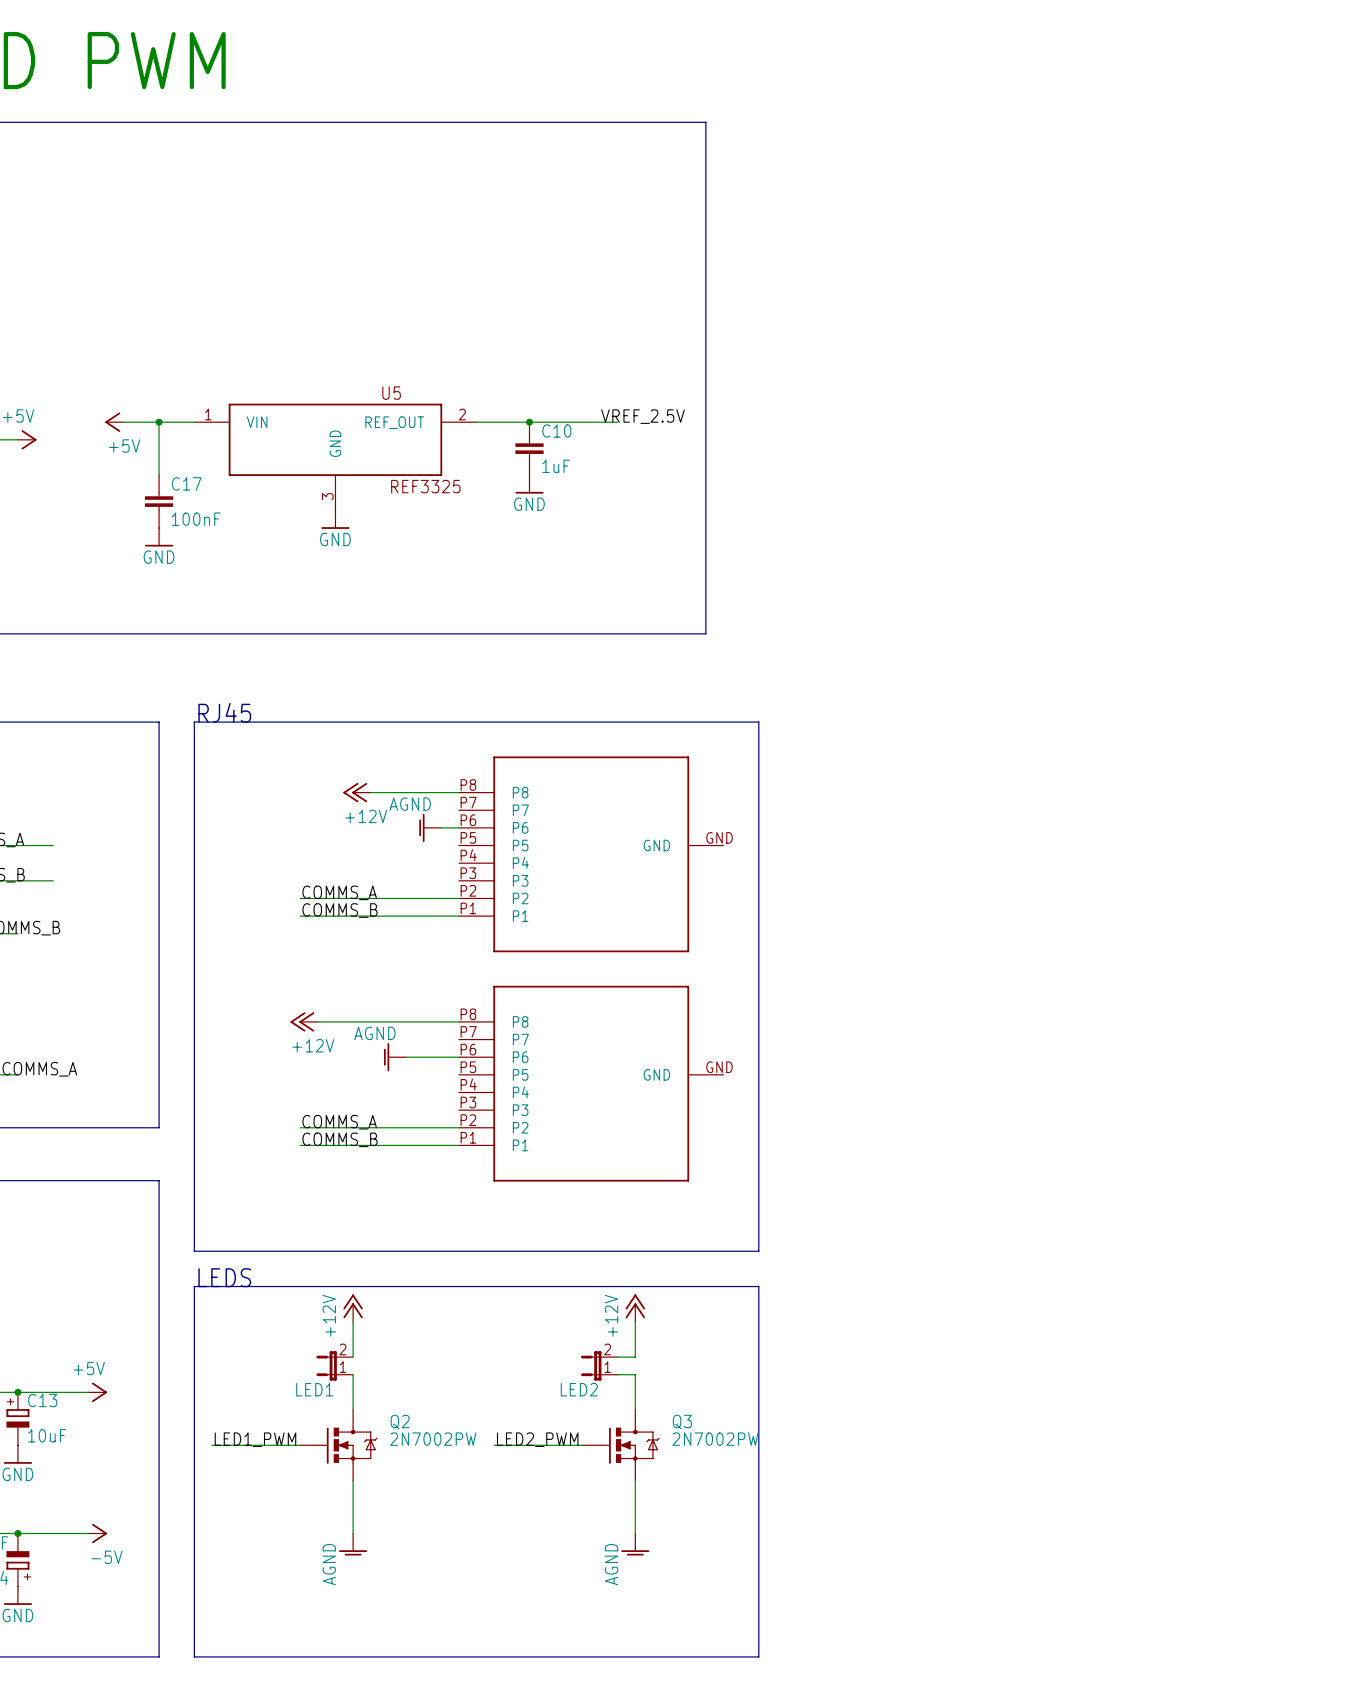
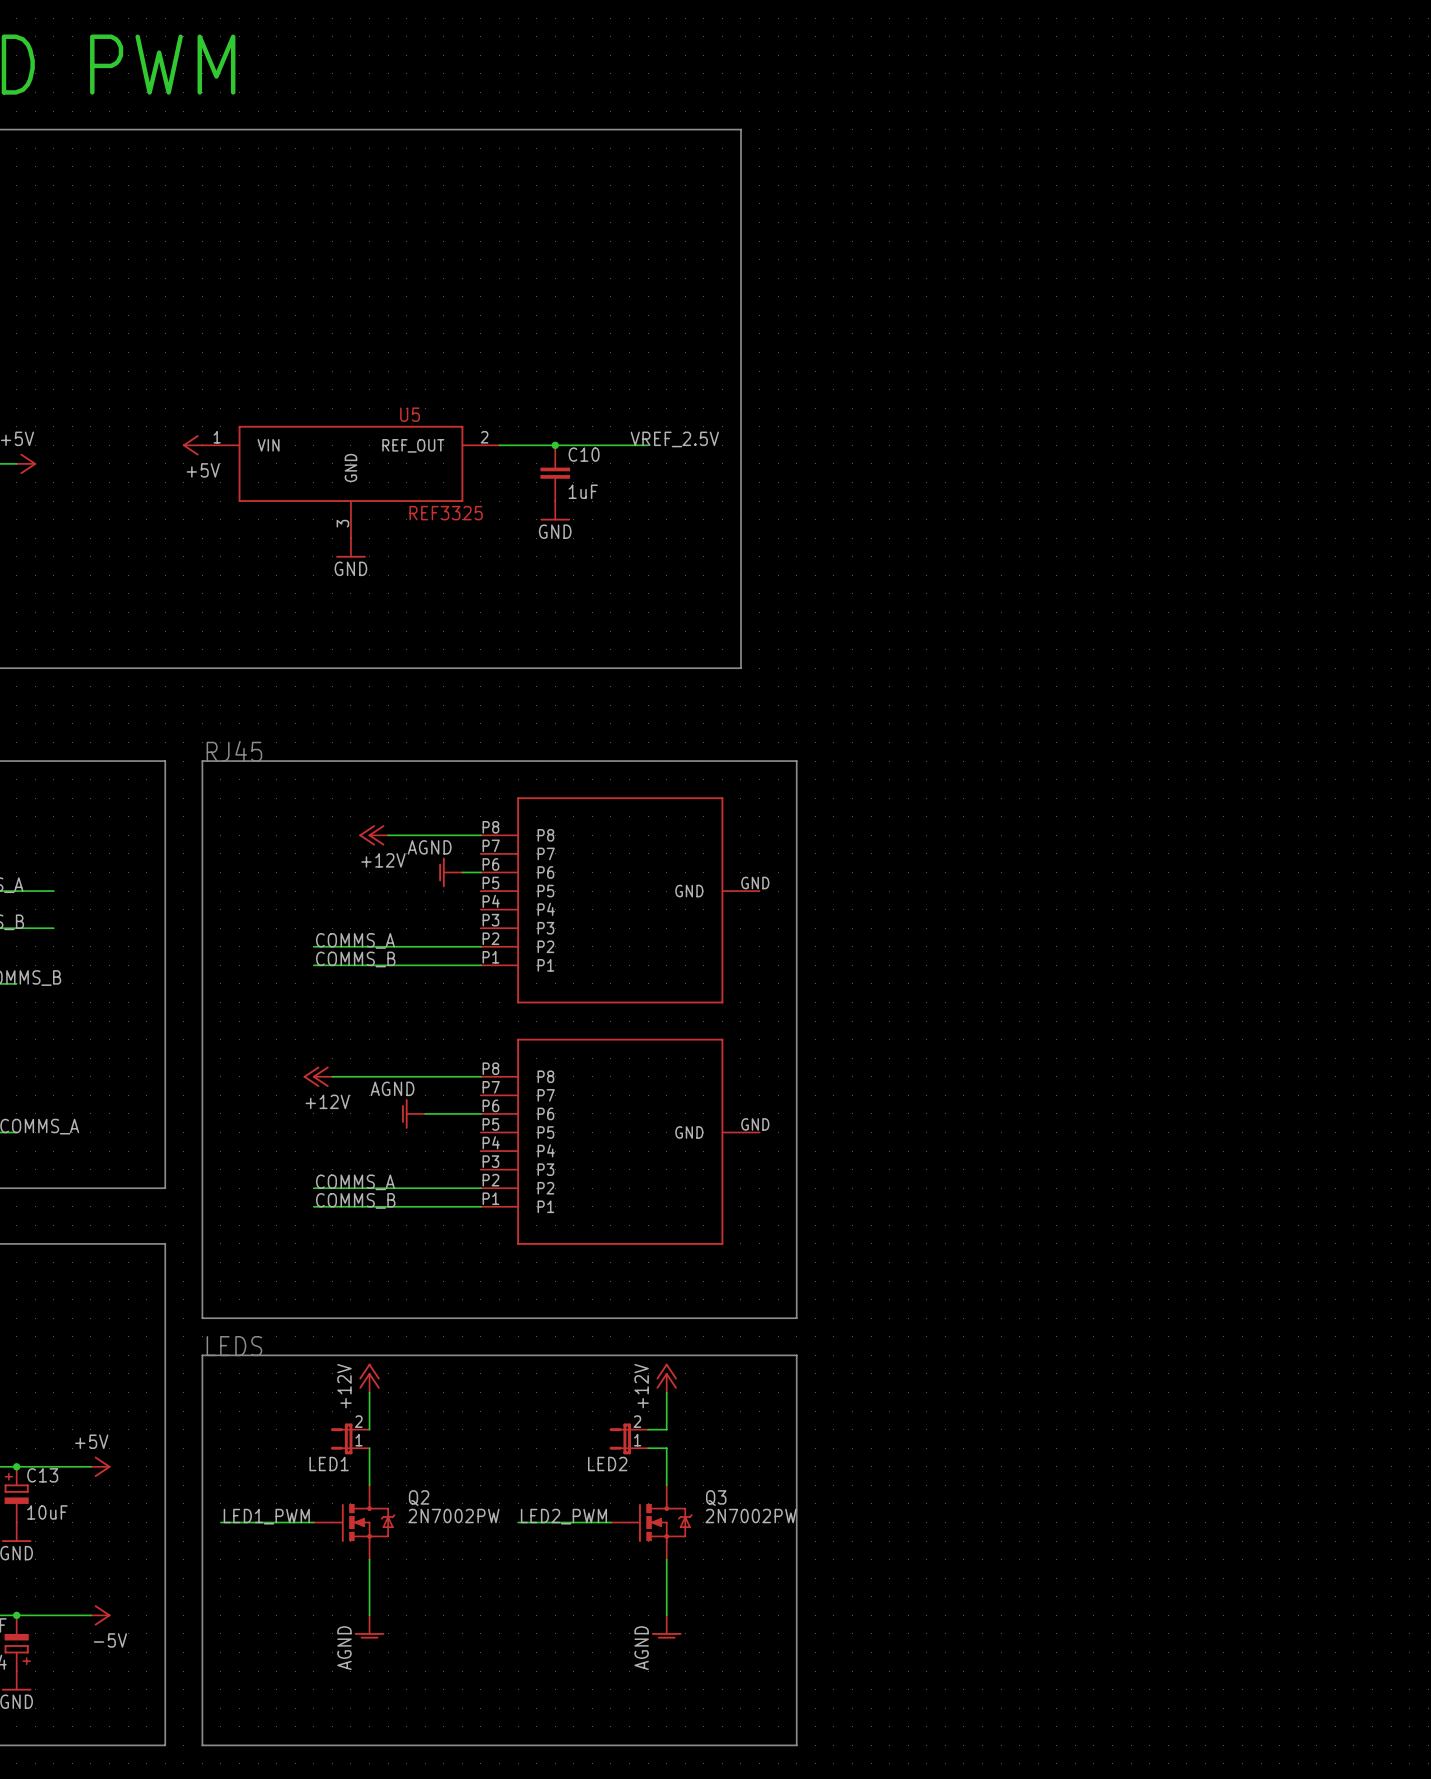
power symbol position: +5V (114, 422) -> +5V (192, 445)
wire: (123, 422) (194, 422) -> none
wire: (159, 422) (159, 475) -> none
junction: (159, 422) -> none
C17: 100nF (159, 501) -> none
power symbol: GND (159, 537) -> none

